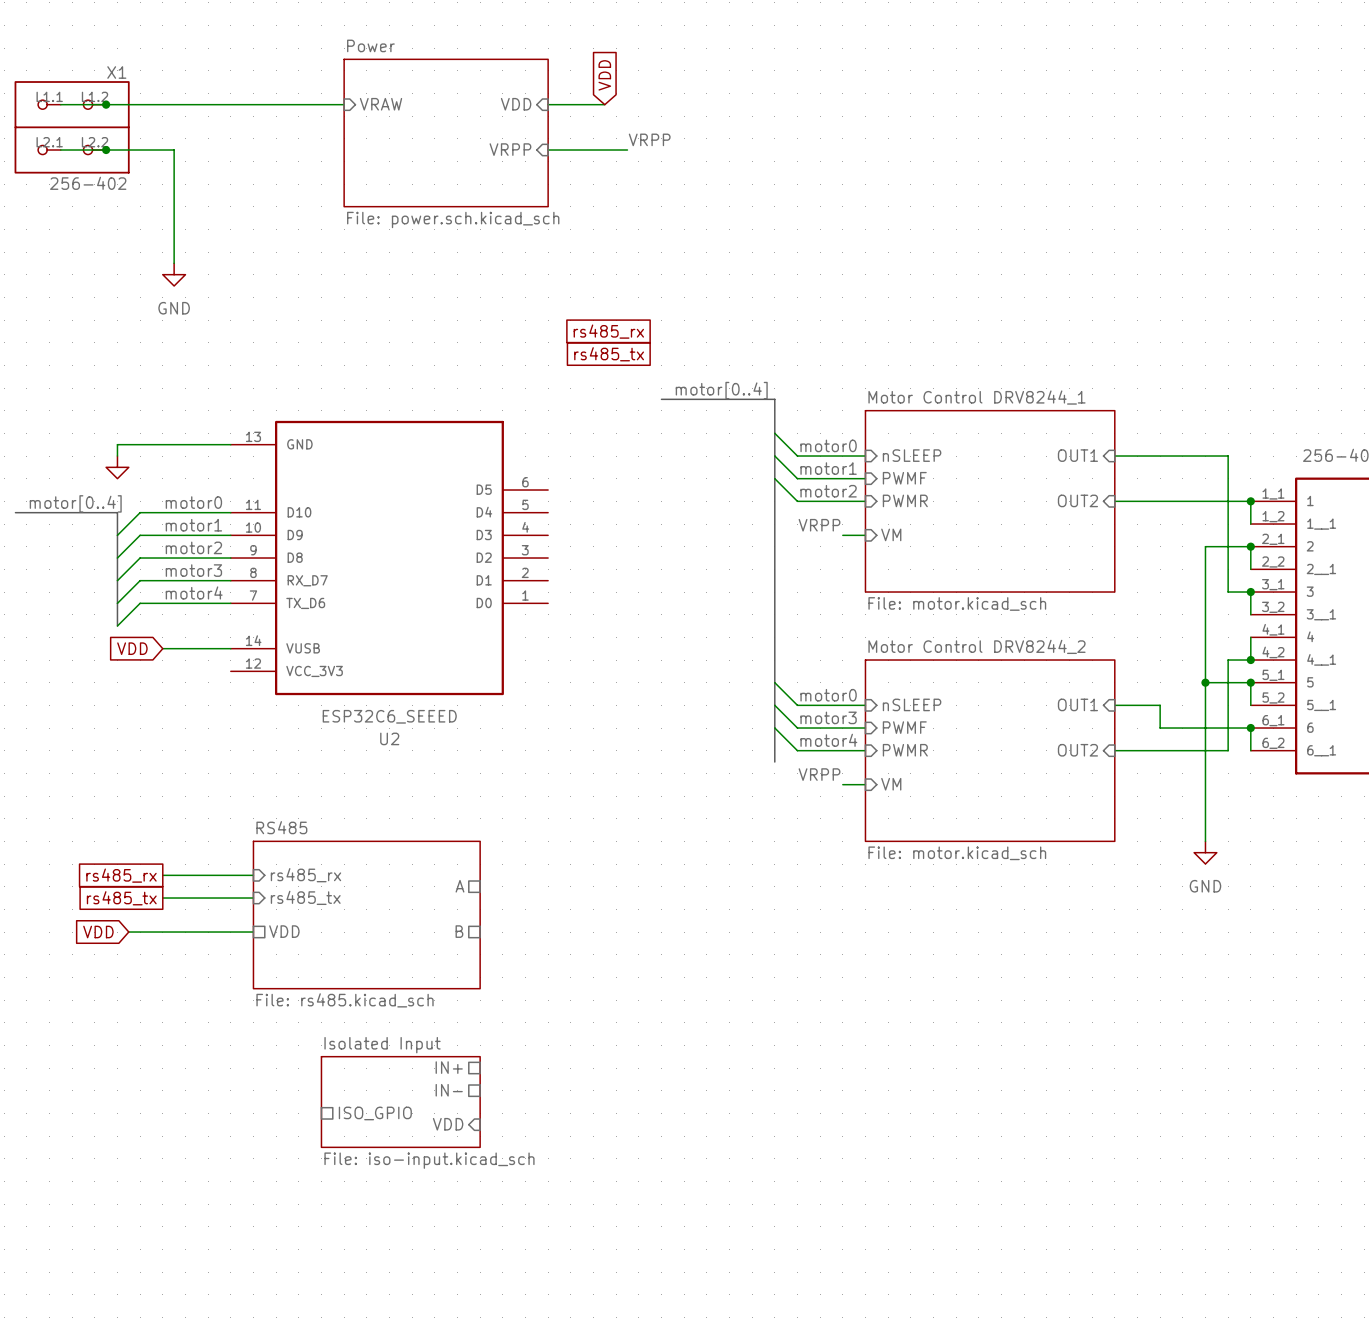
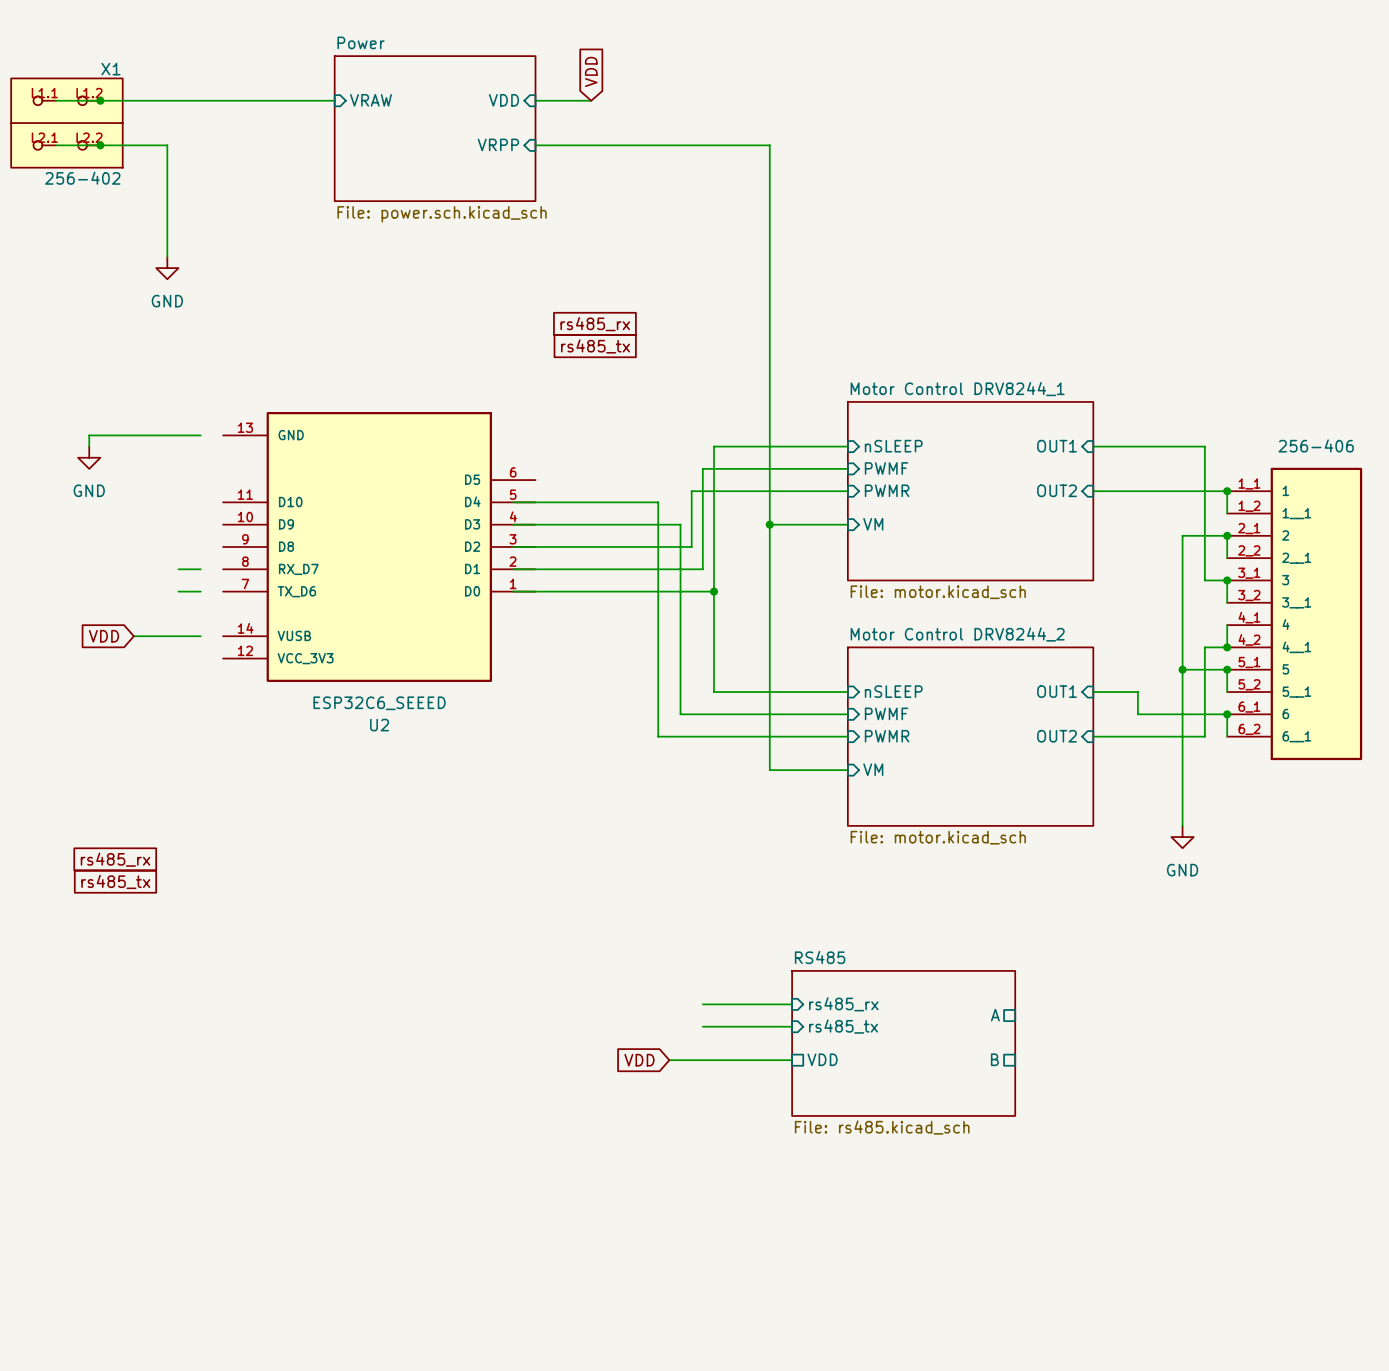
label: VRPP (649, 139) -> none
wire: none -> (613, 145) (769, 145) (769, 770) (825, 770)
label: motor[0..4] (721, 390) -> none
bus: (661, 399) (774, 399) (774, 762) -> none
wire: (774, 433) (797, 456) -> none
wire: (117, 444) (117, 456) -> (111, 435) (89, 435) (89, 446)
wire: (208, 444) (230, 444) -> none
label: motor0 (828, 445) -> none
wire: (774, 456) (797, 478) -> (513, 569) (702, 569) (702, 468) (780, 468)
power symbol: none -> GND (89, 457)
power symbol: (117, 467) -> none
label: motor1 (828, 468) -> none
wire: (774, 478) (797, 501) -> (513, 546) (691, 546) (691, 491) (780, 491)
label: motor2 (828, 491) -> none
label: motor0 (193, 502) -> none
label: motor[0..4] (75, 503) -> none
bus: (15, 512) (117, 512) (117, 626) -> none
wire: (230, 512) (140, 512) (117, 535) -> none
label: motor1 (193, 525) -> none
label: VRPP (819, 525) -> none
wire: (230, 535) (140, 535) (117, 558) -> none
wire: none -> (769, 524) (825, 524)
junction: none -> (769, 524)
label: motor2 (193, 547) -> none
wire: (230, 558) (140, 558) (117, 580) -> none
label: motor3 (193, 570) -> none
wire: (185, 580) (140, 580) (117, 603) -> none
wire: (208, 580) (230, 580) -> none
label: motor4 (194, 592) -> none
wire: (185, 603) (140, 603) (117, 626) -> none
wire: (208, 603) (230, 603) -> none
wire: none -> (513, 591) (713, 591)
junction: none -> (713, 591)
global label position: VDD (132, 648) -> VDD (103, 636)
wire: (208, 648) (230, 648) -> (133, 636) (156, 636)
wire: (774, 682) (797, 705) -> (780, 446) (713, 446) (713, 692) (780, 692)
label: motor0 (828, 695) -> none
wire: (774, 705) (797, 728) -> (513, 524) (680, 524) (680, 714) (780, 714)
label: motor3 (828, 717) -> none
wire: (774, 728) (797, 750) -> (513, 502) (658, 502) (658, 736) (780, 736)
label: motor4 (828, 740) -> none
label: VRPP (819, 774) -> none
wire: (162, 875) (253, 875) -> none
sheet pin: rs485_rx (305, 875) -> none
sheet pin: A (459, 886) -> none
sheet pin: rs485_tx (305, 897) -> none
wire: (162, 898) (253, 898) -> none
sheet RS485 position: (366, 915) -> (903, 1043)
sheet pin: VDD (284, 931) -> none
sheet pin: B (459, 931) -> none
global label: VDD (98, 932) -> none
wire: (128, 932) (253, 932) -> none
wire: none -> (702, 1004) (792, 1004)
sheet pin: none -> rs485_rx (843, 1004)
sheet pin: none -> A (995, 1015)
wire: none -> (702, 1026) (792, 1026)
sheet pin: none -> rs485_tx (843, 1026)
sheet pin: IN+ (449, 1067) -> none
sheet pin: none -> VDD (822, 1059)
sheet pin: none -> B (994, 1059)
global label: none -> VDD (639, 1060)
wire: none -> (669, 1060) (792, 1060)
sheet pin: IN- (449, 1090) -> none
sheet Isolated Input: File: iso-input.kicad_sch (400, 1102) -> none
sheet pin: ISO_GPIO (375, 1113) -> none
sheet pin: VDD (448, 1124) -> none

